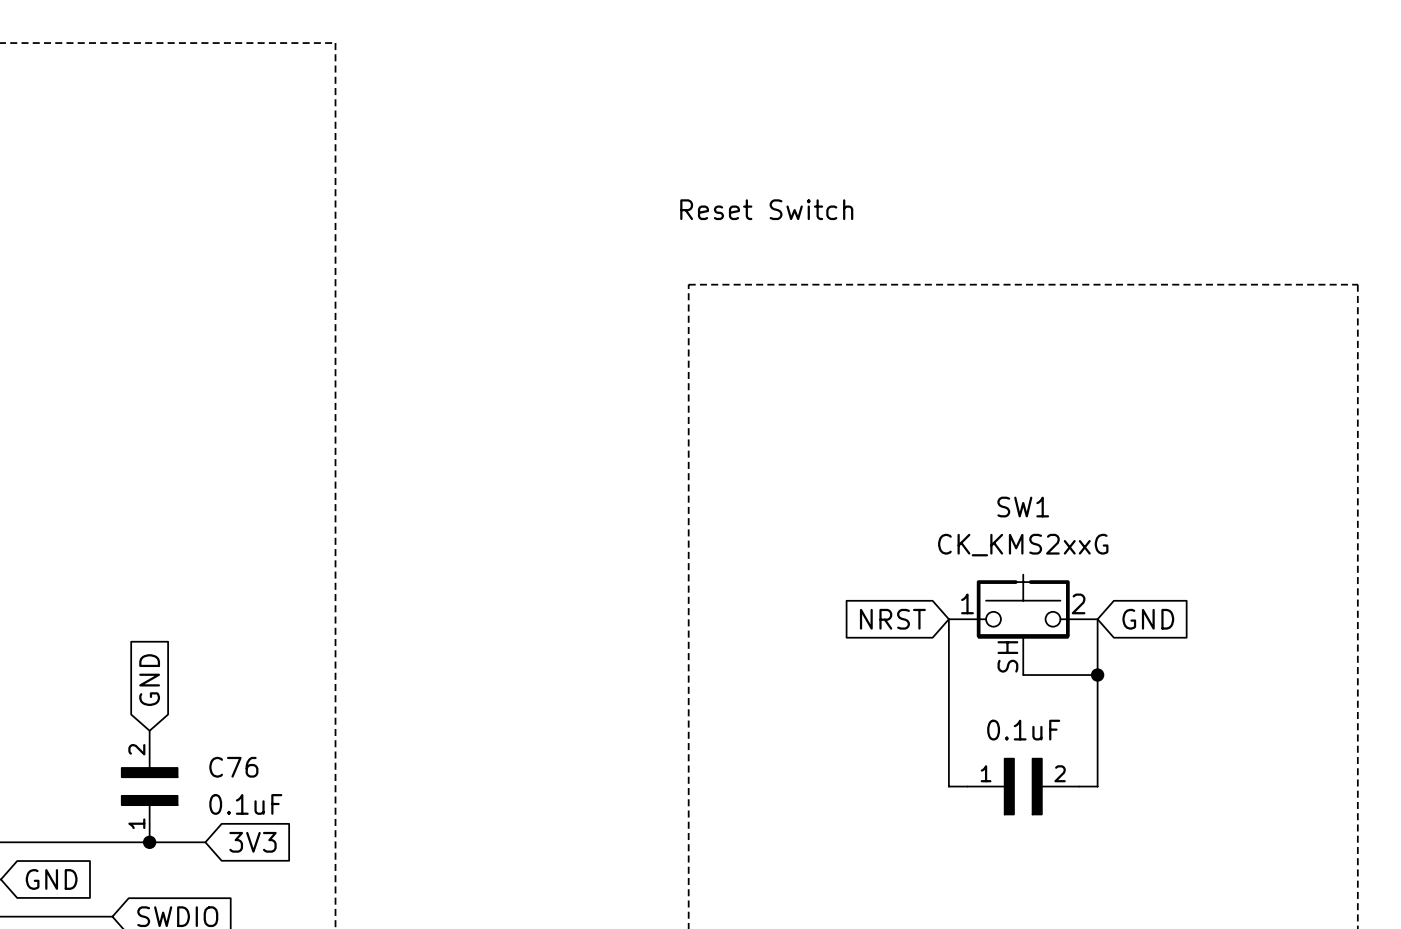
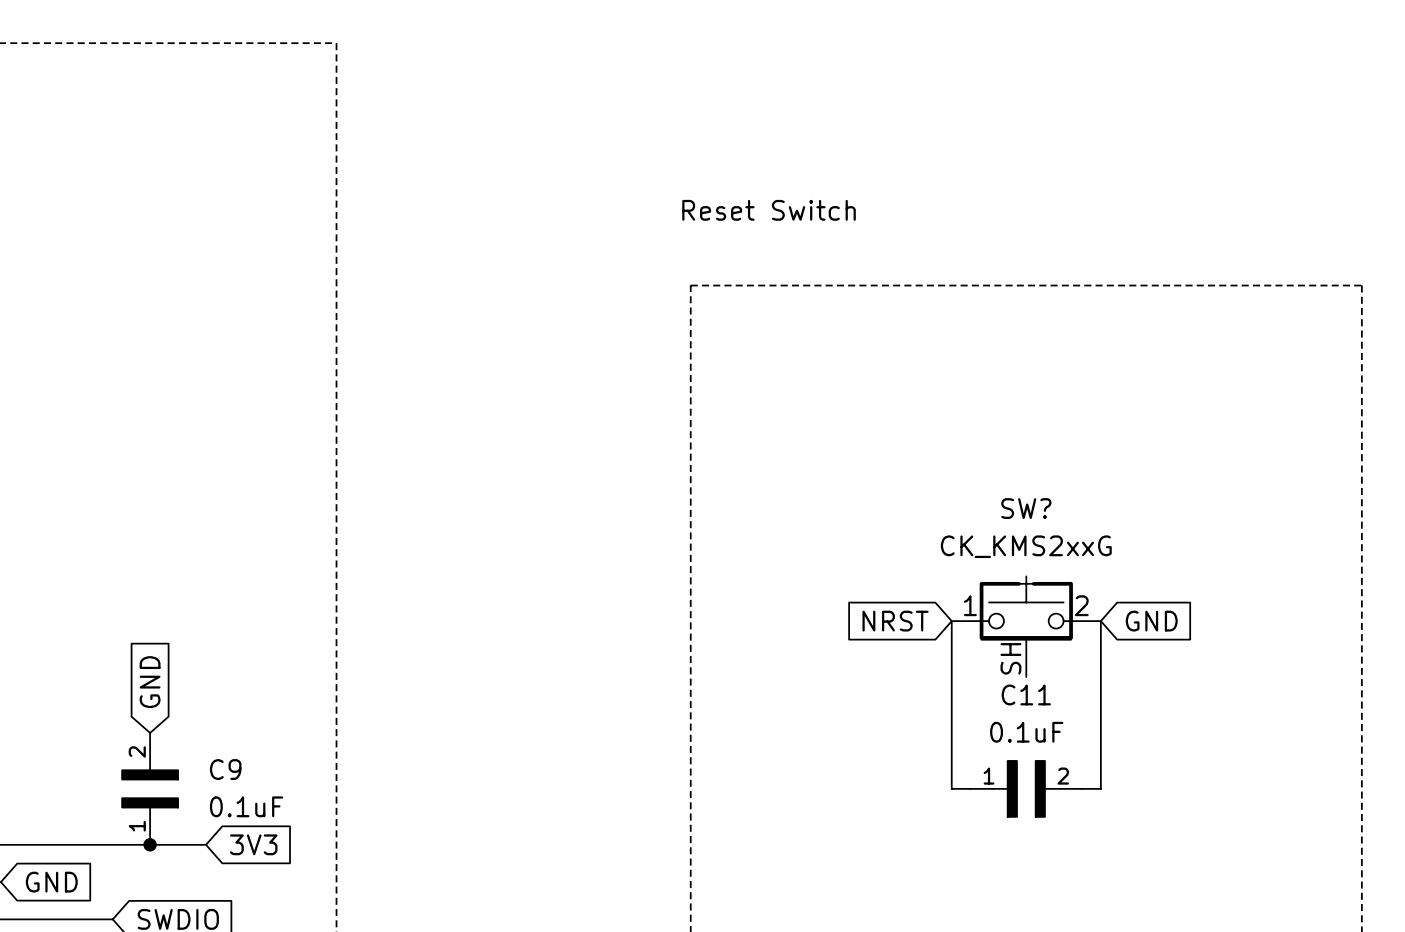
SW1 name: SW1 (1023, 507) -> SW? (1026, 508)
wire: (1023, 675) (1097, 675) -> none
junction: (1097, 675) -> none
C11 name: none -> C11 (1026, 694)
C76 name: C76 (233, 767) -> C9 (225, 769)

